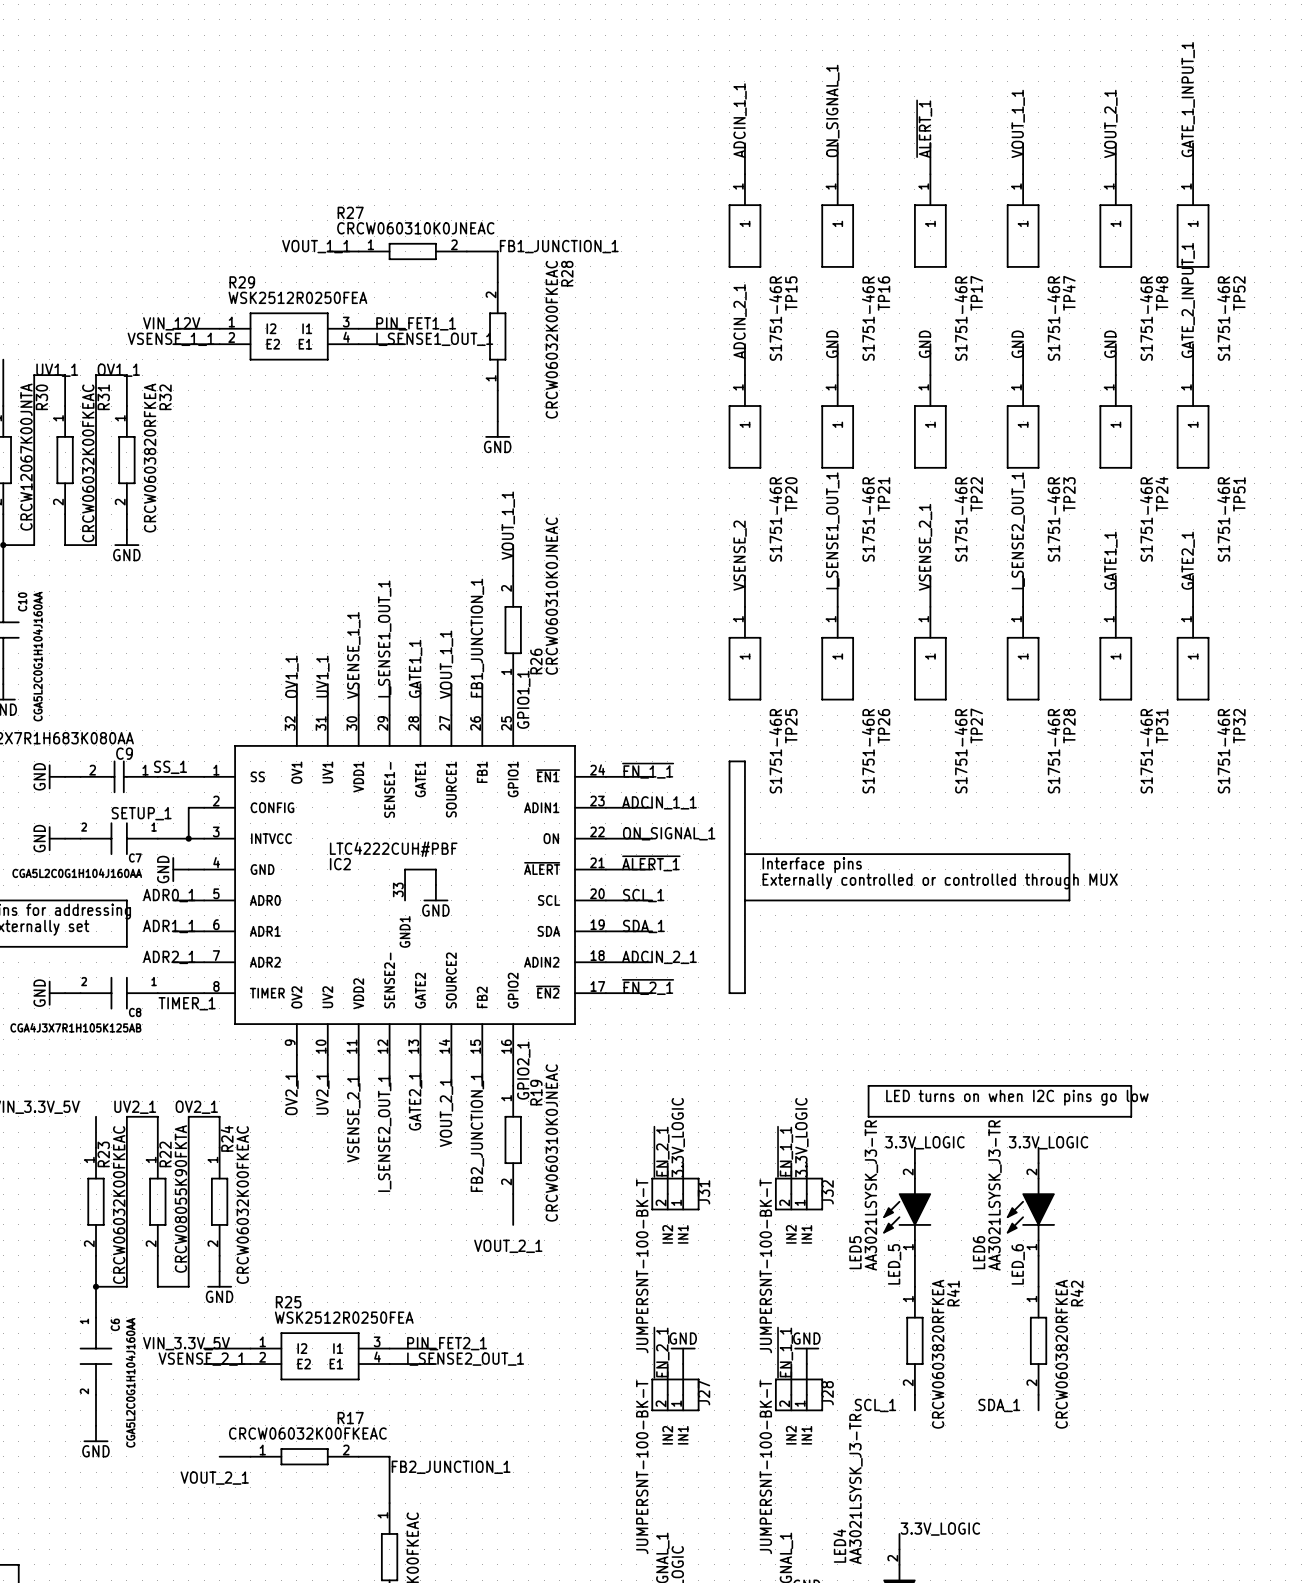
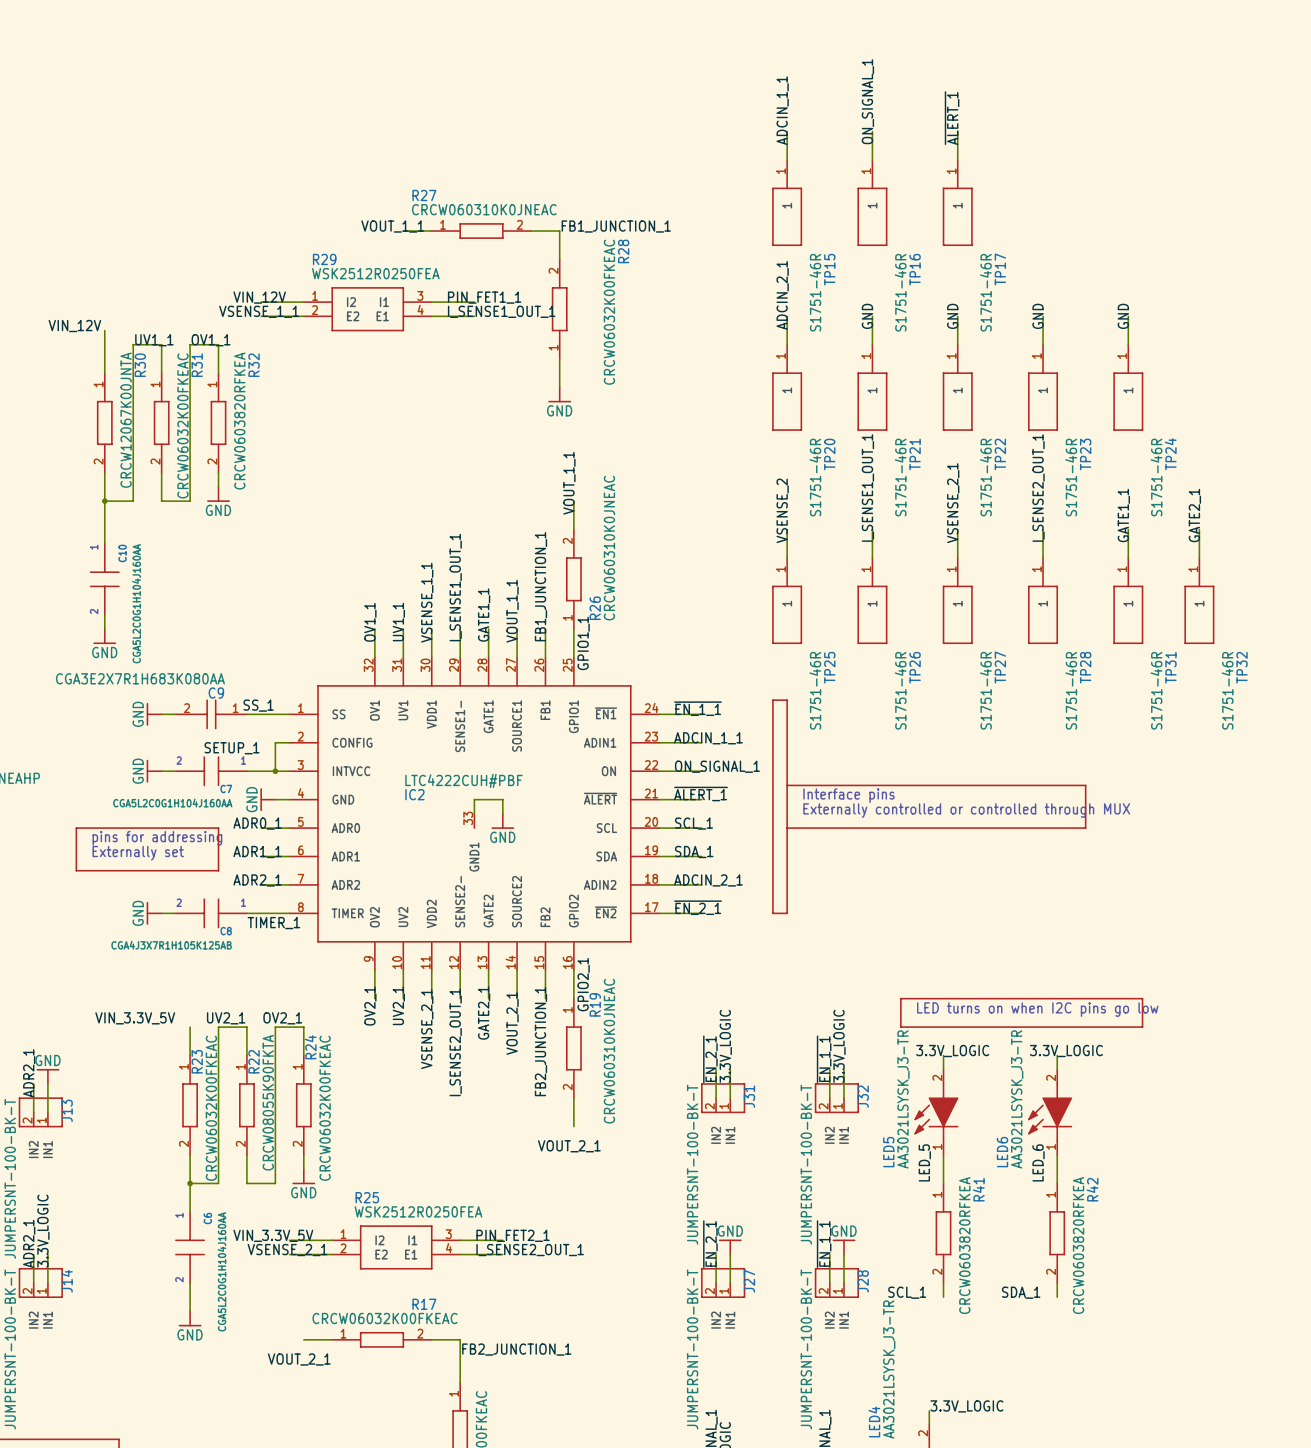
label: GATE_1_INPUT_1 (1188, 99) -> none
label: VOUT_1_1 (1018, 123) -> none
label: VOUT_2_1 (1110, 123) -> none
wire: (1023, 143) (1023, 174) -> none
wire: (1115, 143) (1115, 174) -> none
wire: (1193, 143) (1193, 174) -> none
TP47: S1751-46R (1023, 220) -> none
TP48: S1751-46R (1115, 220) -> none
TP52: S1751-46R (1193, 220) -> none
label: GATE_2_INPUT_1 (1188, 300) -> none
wire: (1193, 344) (1193, 375) -> none
TP51: S1751-46R (1193, 421) -> none

